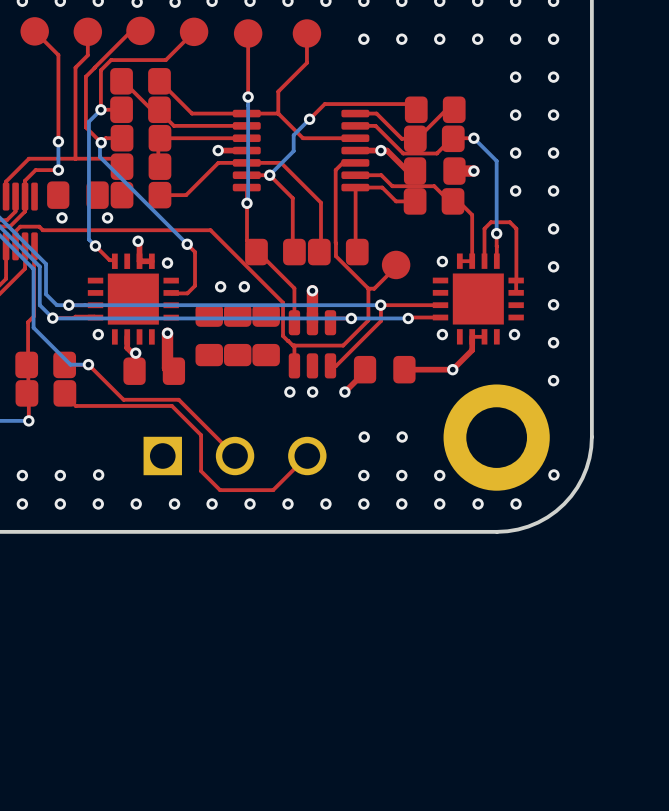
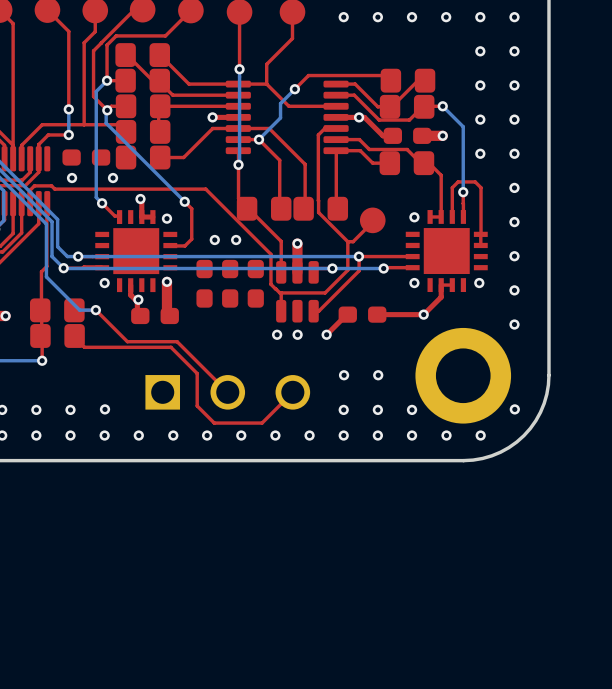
part footprint: [403, 157, 466, 185] -> [383, 127, 432, 144]
part footprint: [47, 181, 109, 209] -> [62, 149, 111, 166]
part footprint: [195, 304, 224, 367] -> [196, 259, 213, 308]
part footprint: [223, 304, 252, 367] -> [222, 259, 239, 308]
part footprint: [252, 304, 280, 367] -> [247, 259, 264, 308]
part footprint: [353, 355, 416, 384] -> [338, 306, 387, 323]
part footprint: [123, 357, 186, 385] -> [131, 307, 179, 325]

